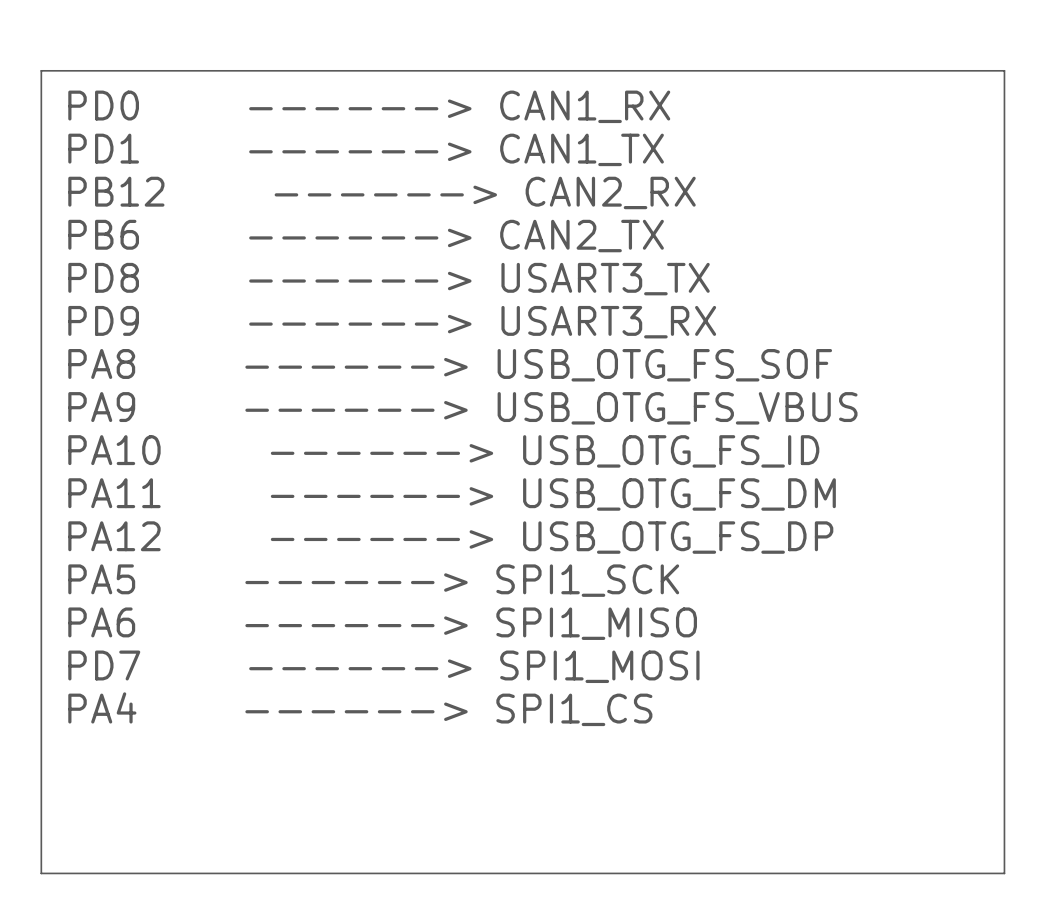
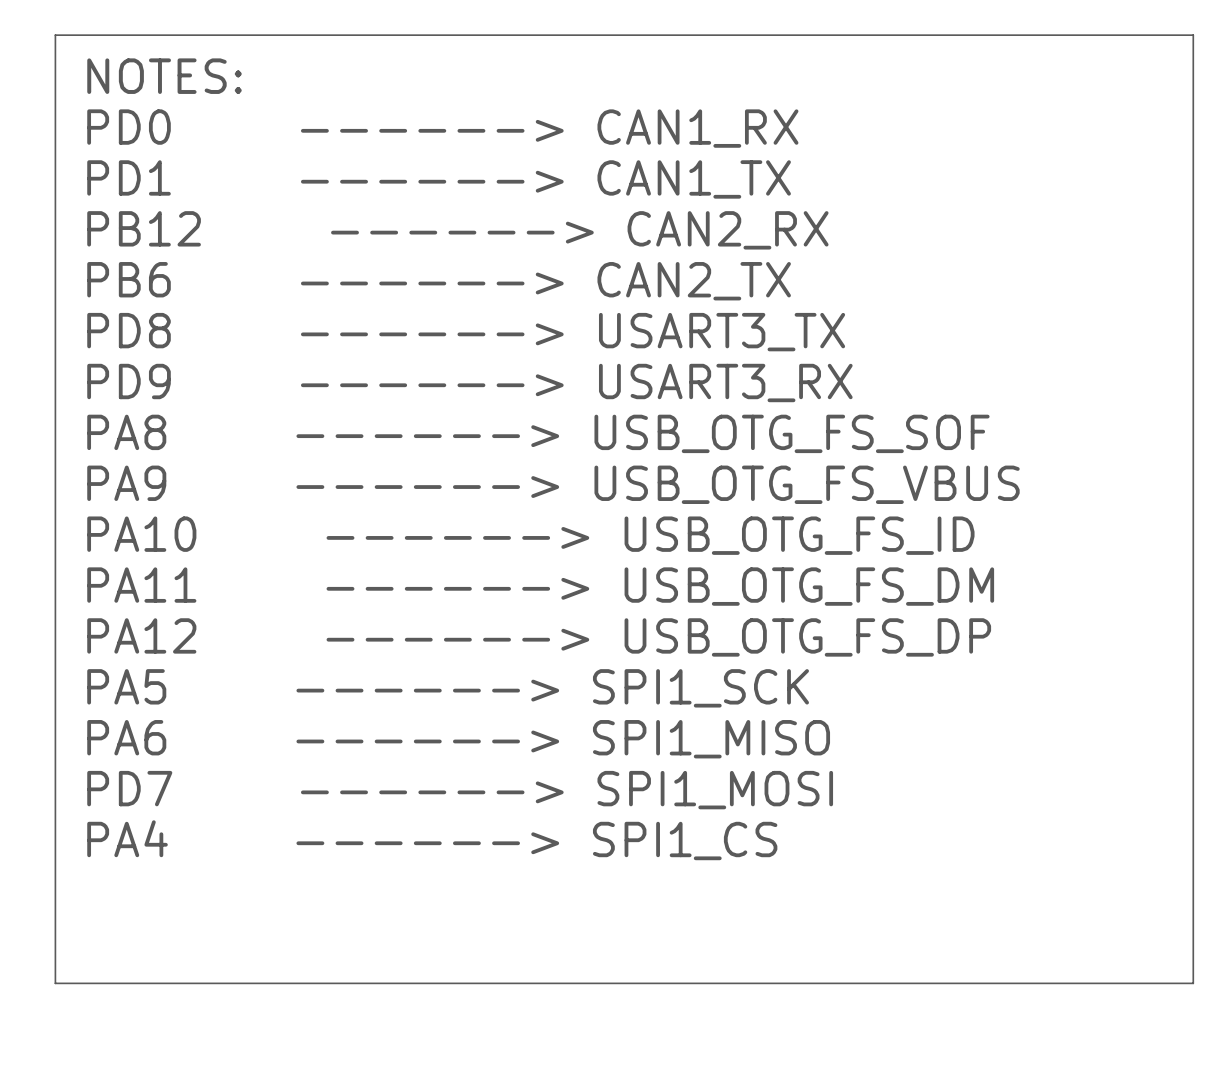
text: none -> NOTES: (164, 76)
line: (41, 70) (1004, 70) -> (55, 86) (55, 35) (1193, 35) (1193, 86)
line: (41, 830) (41, 873) (1004, 873) (1004, 830) -> (55, 983) (1193, 983)

